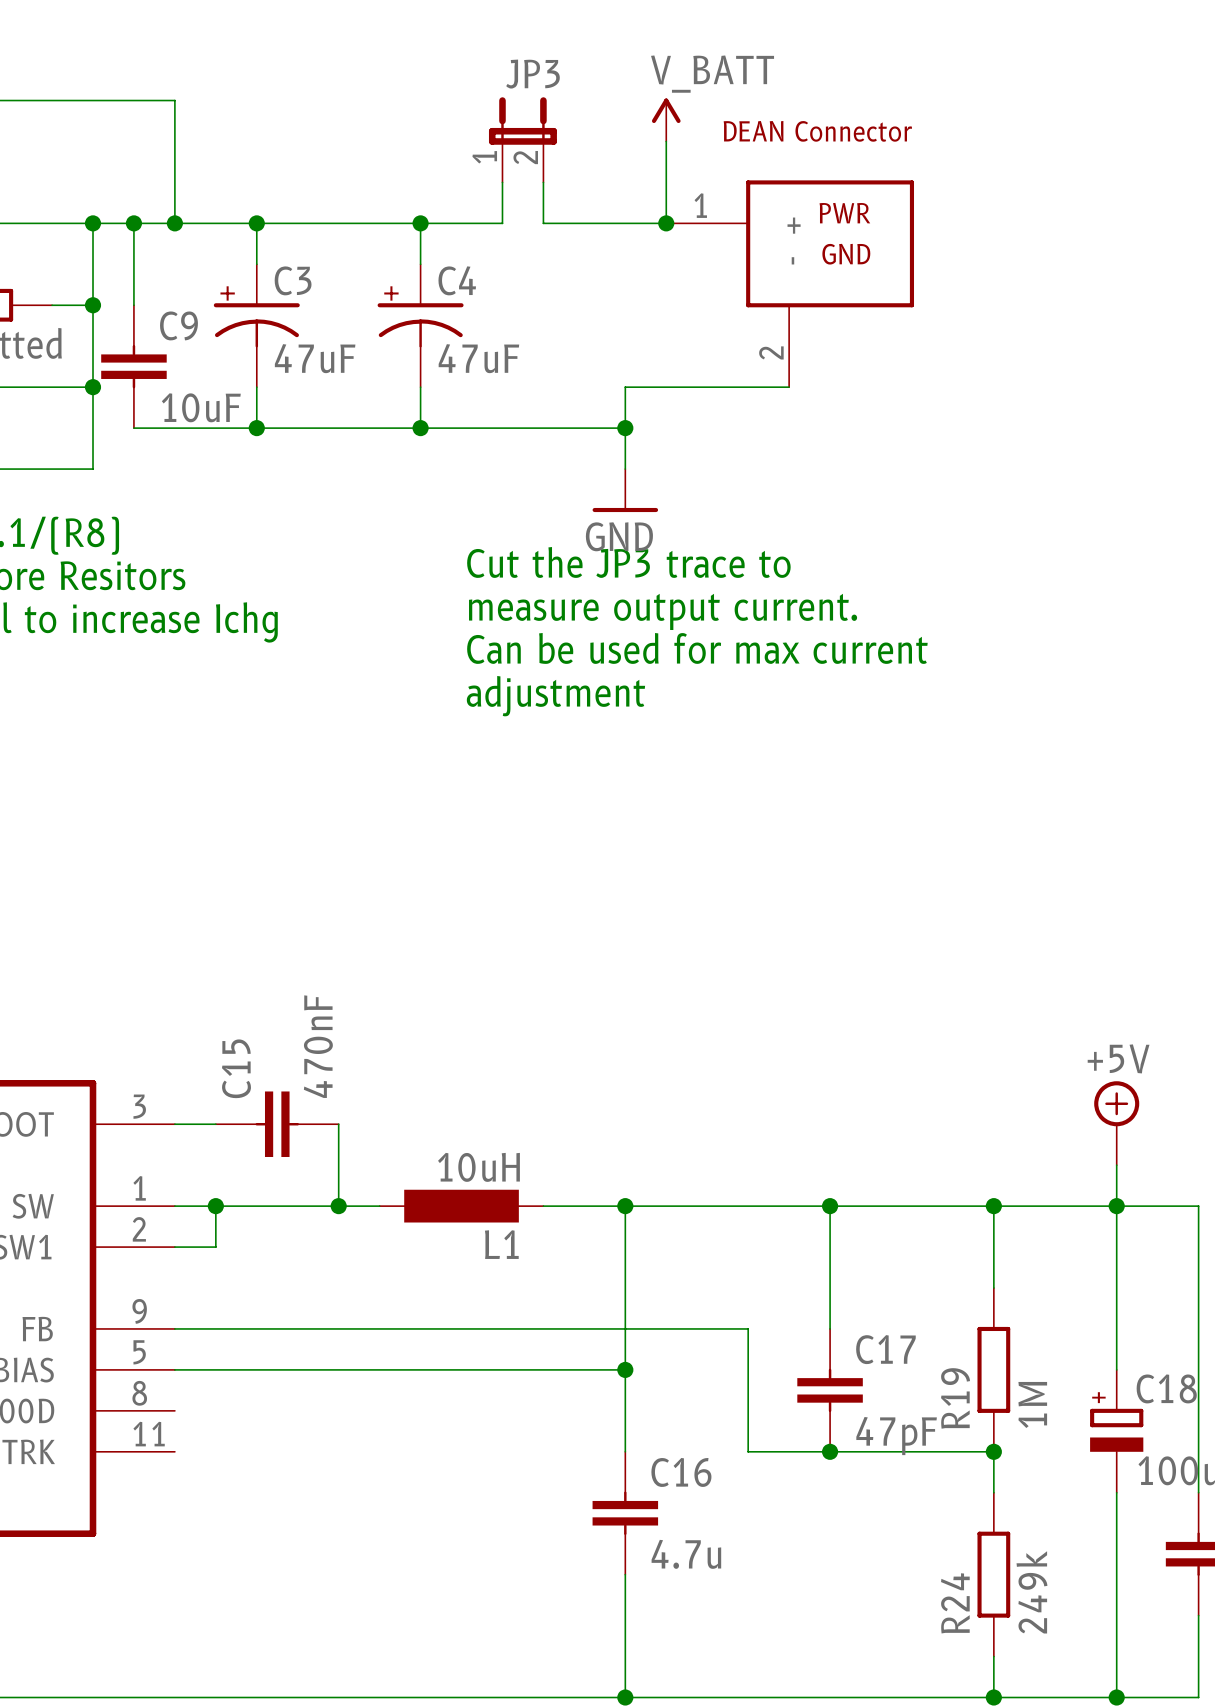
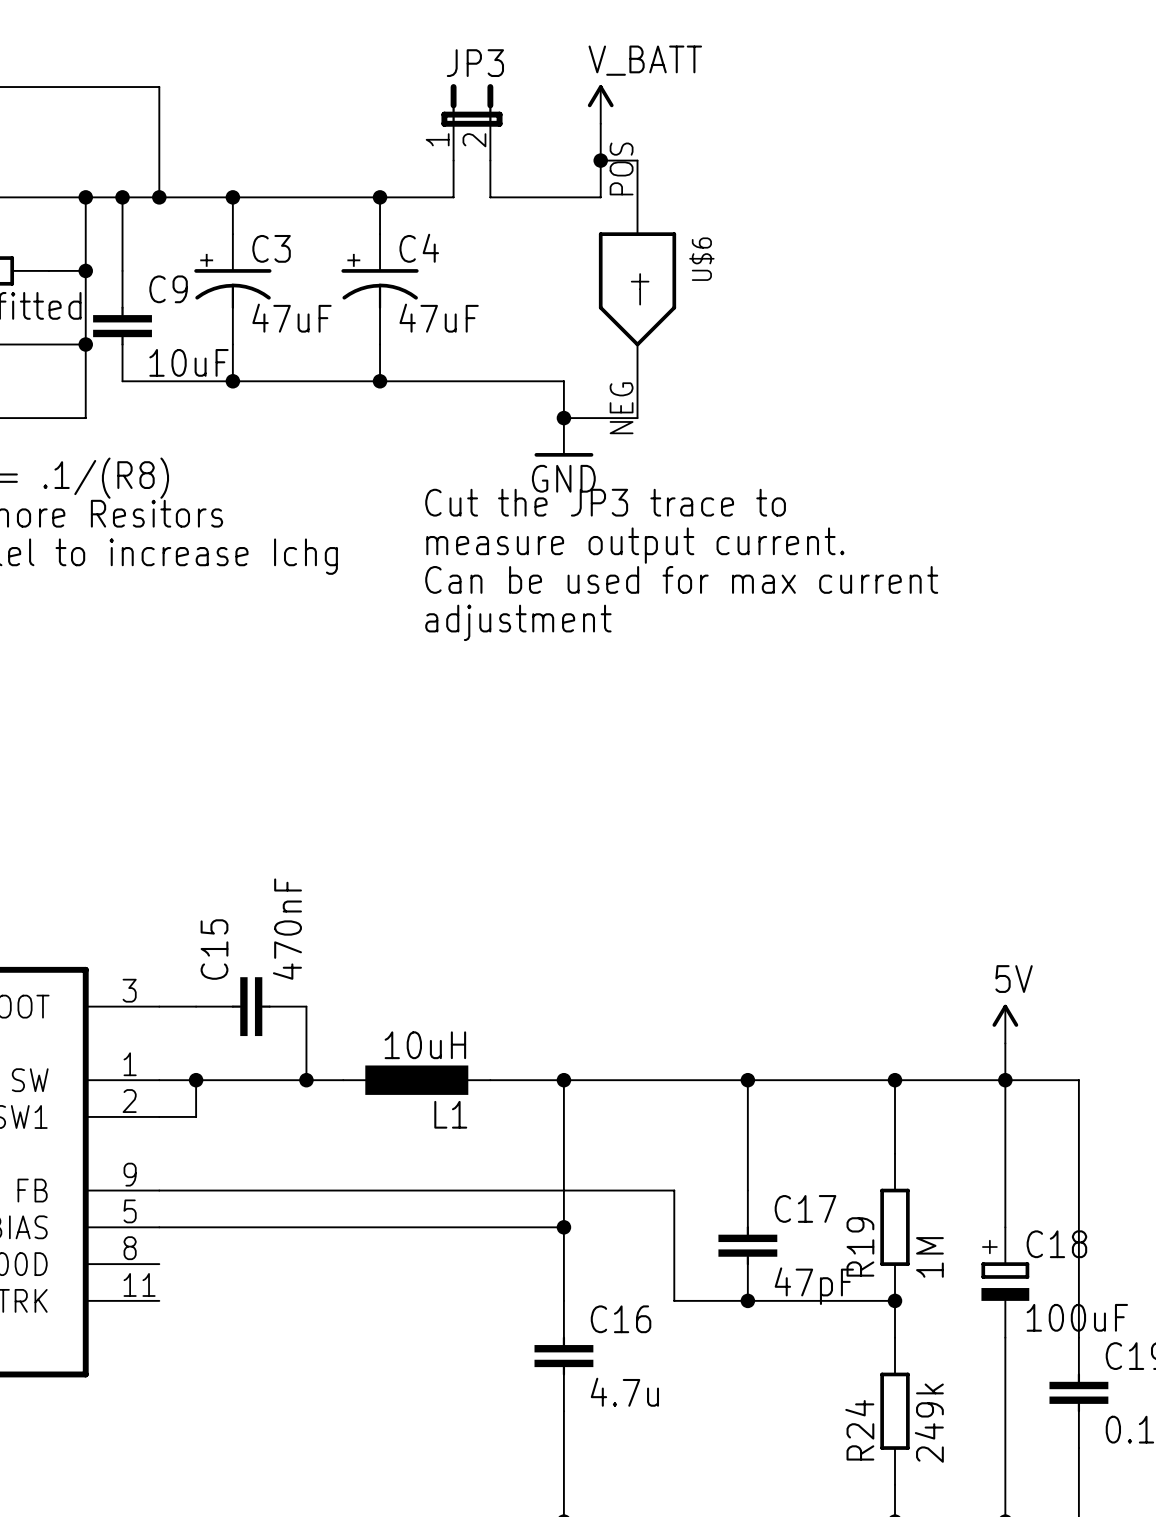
wire: none -> (600, 160) (637, 160)
junction position: (666, 223) -> (600, 160)
part: (790, 283) -> none
U$6: none -> (637, 289)
wire: (789, 387) (625, 387) (625, 428) -> none
junction position: (625, 428) -> (563, 418)
wire: none -> (563, 418) (637, 418)
power symbol: +5V (1116, 1123) -> none
power symbol: none -> 5V (1005, 1024)

